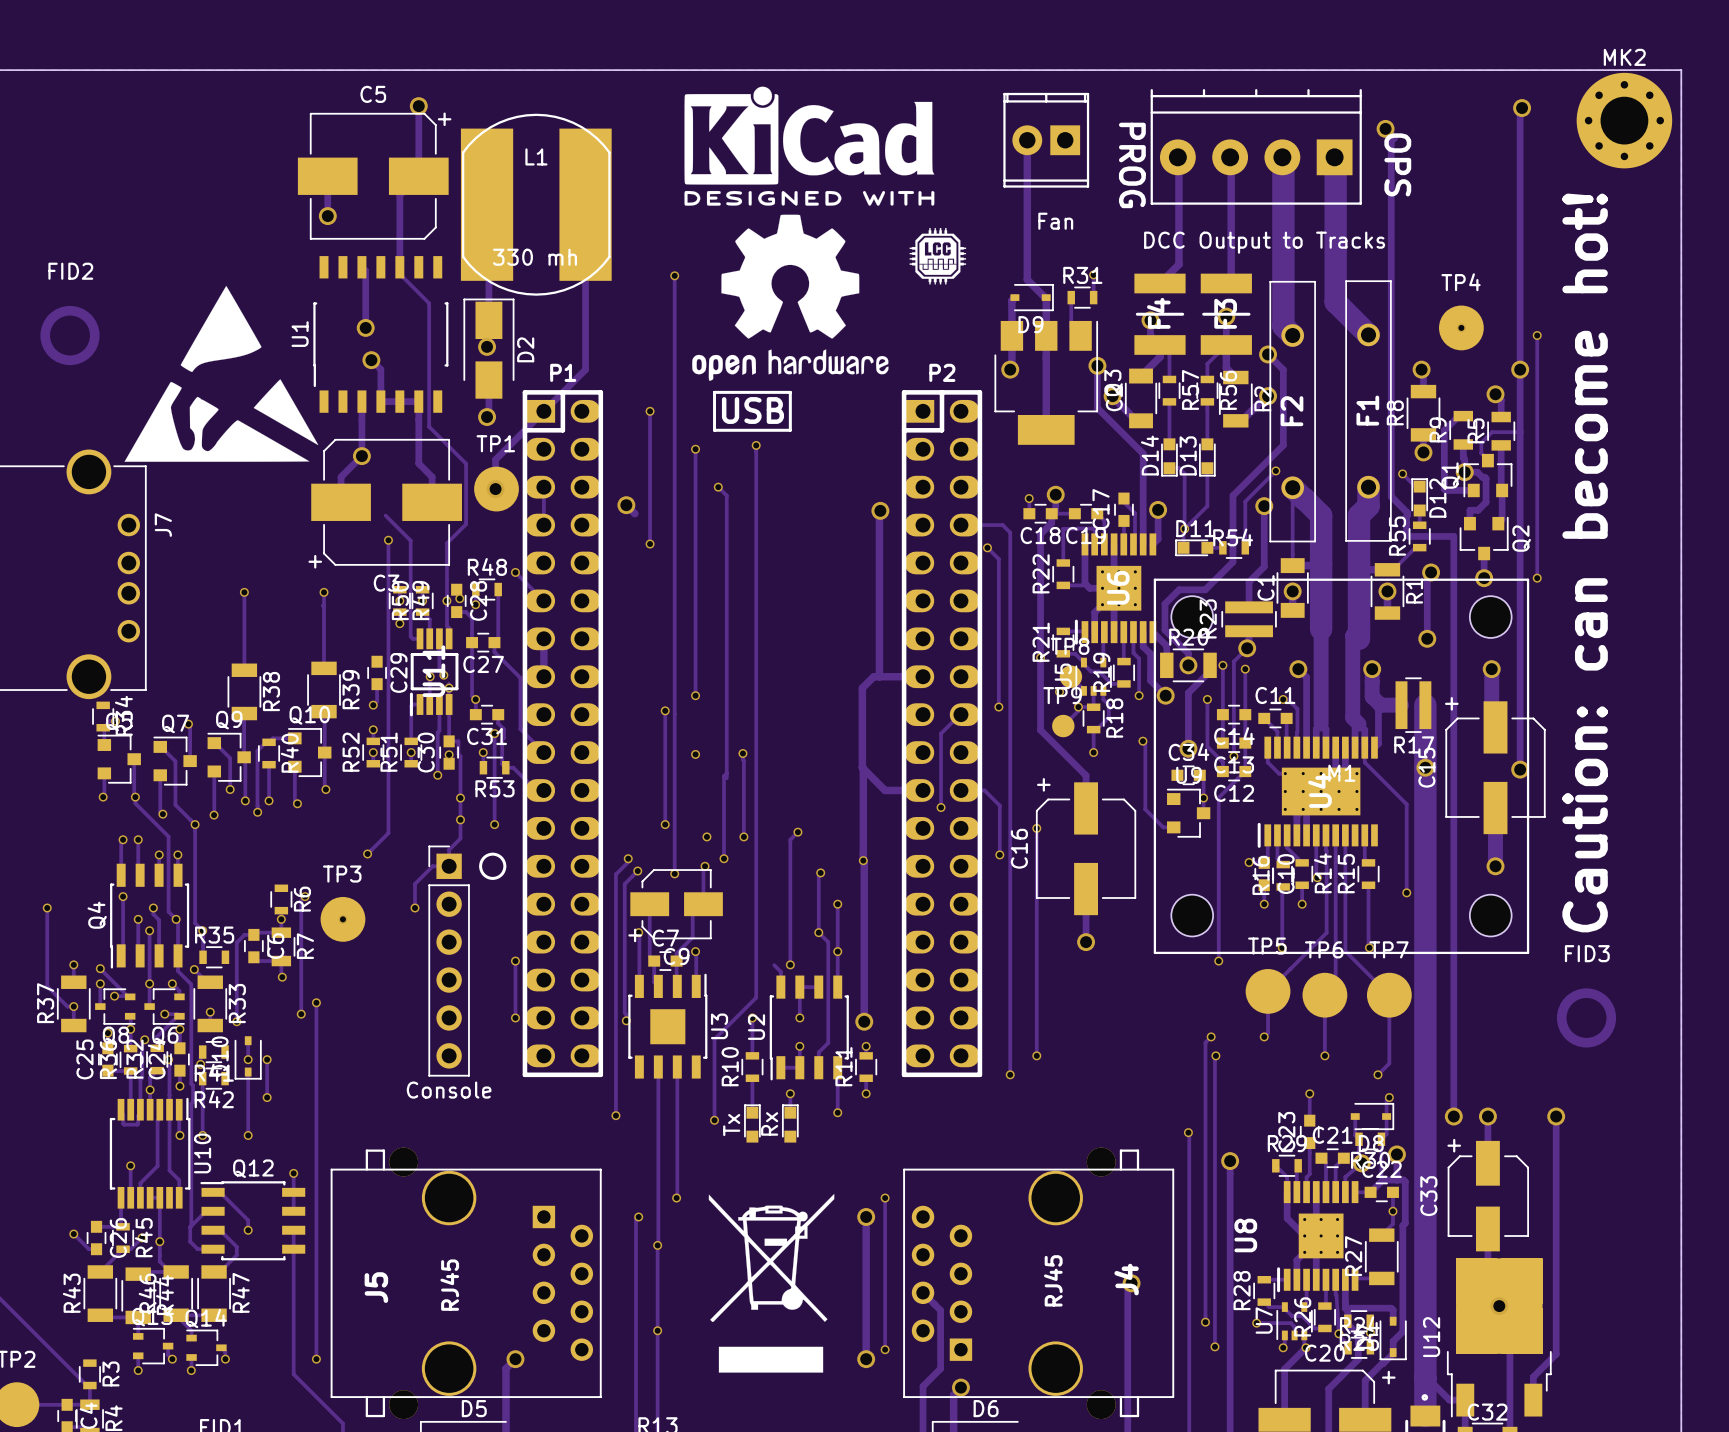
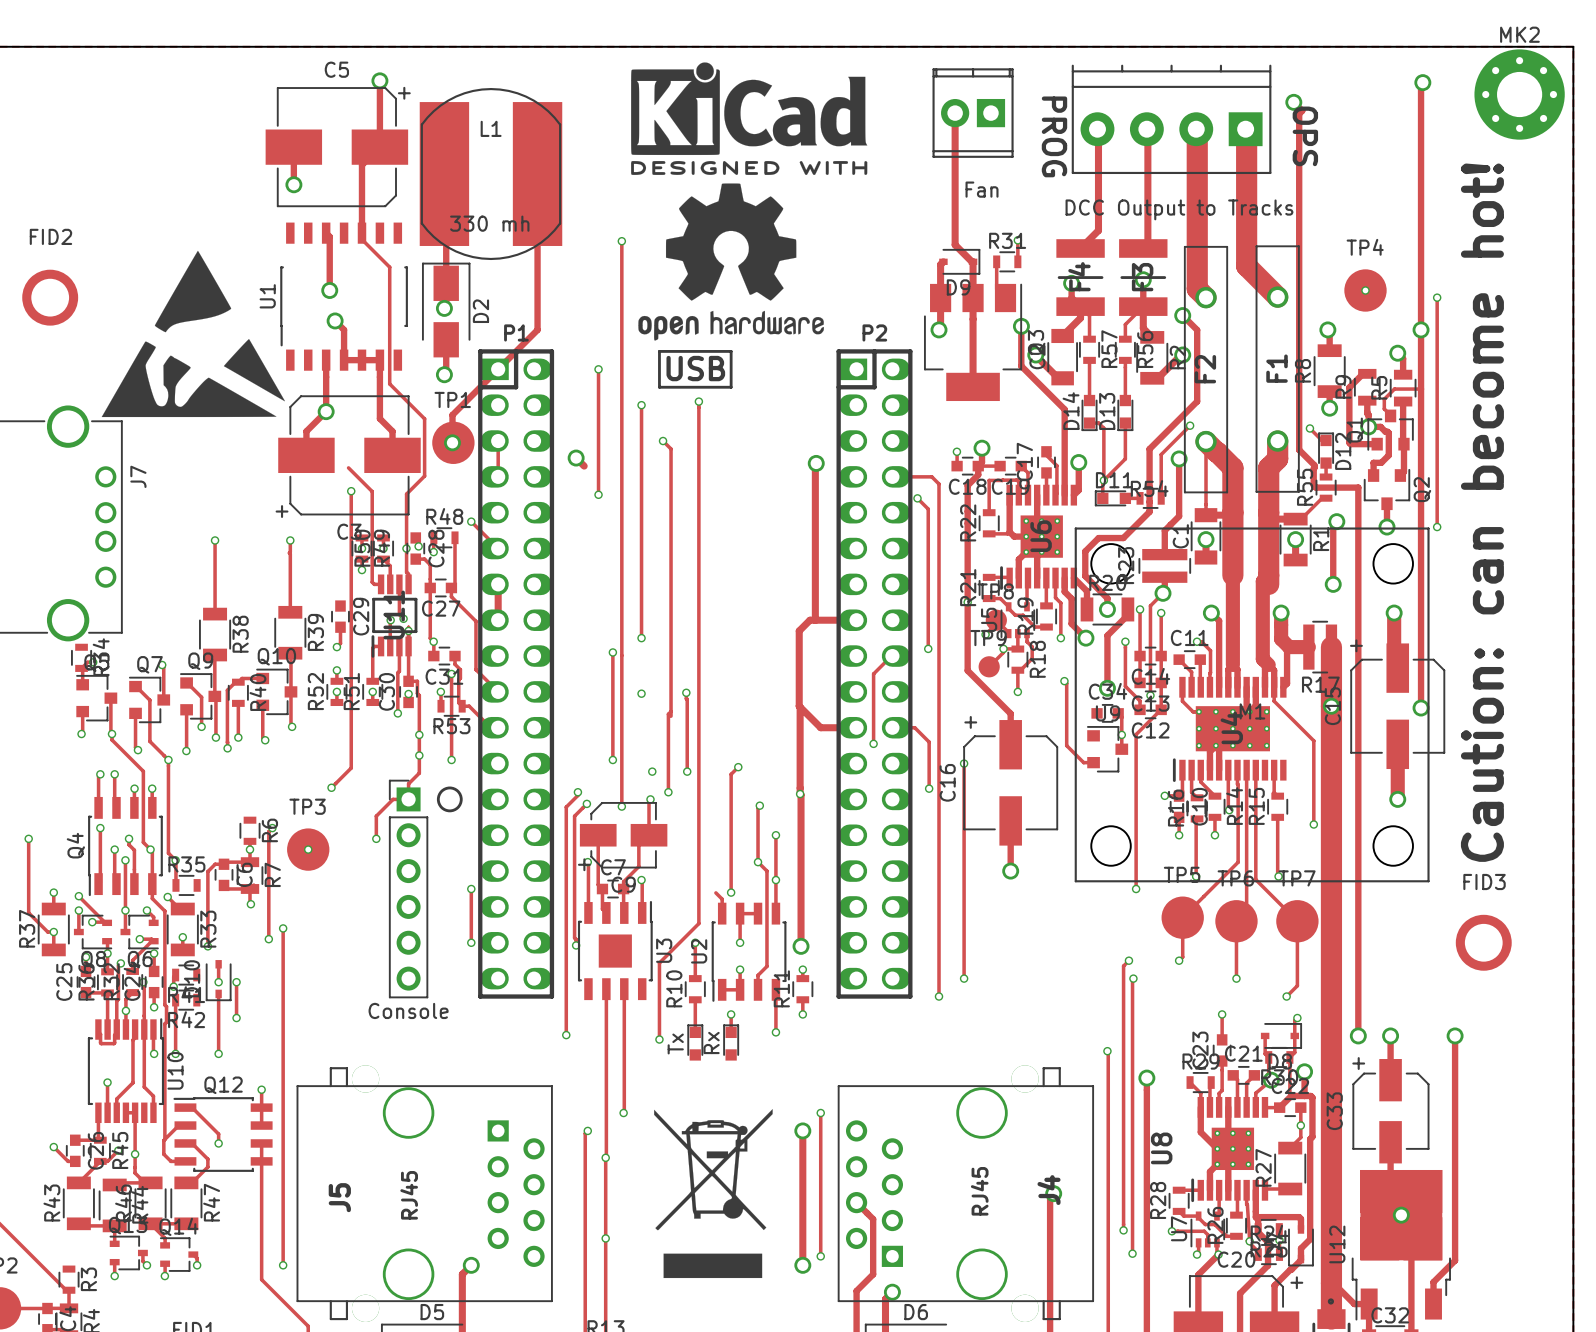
drawing: [909, 228, 967, 285] -> none

